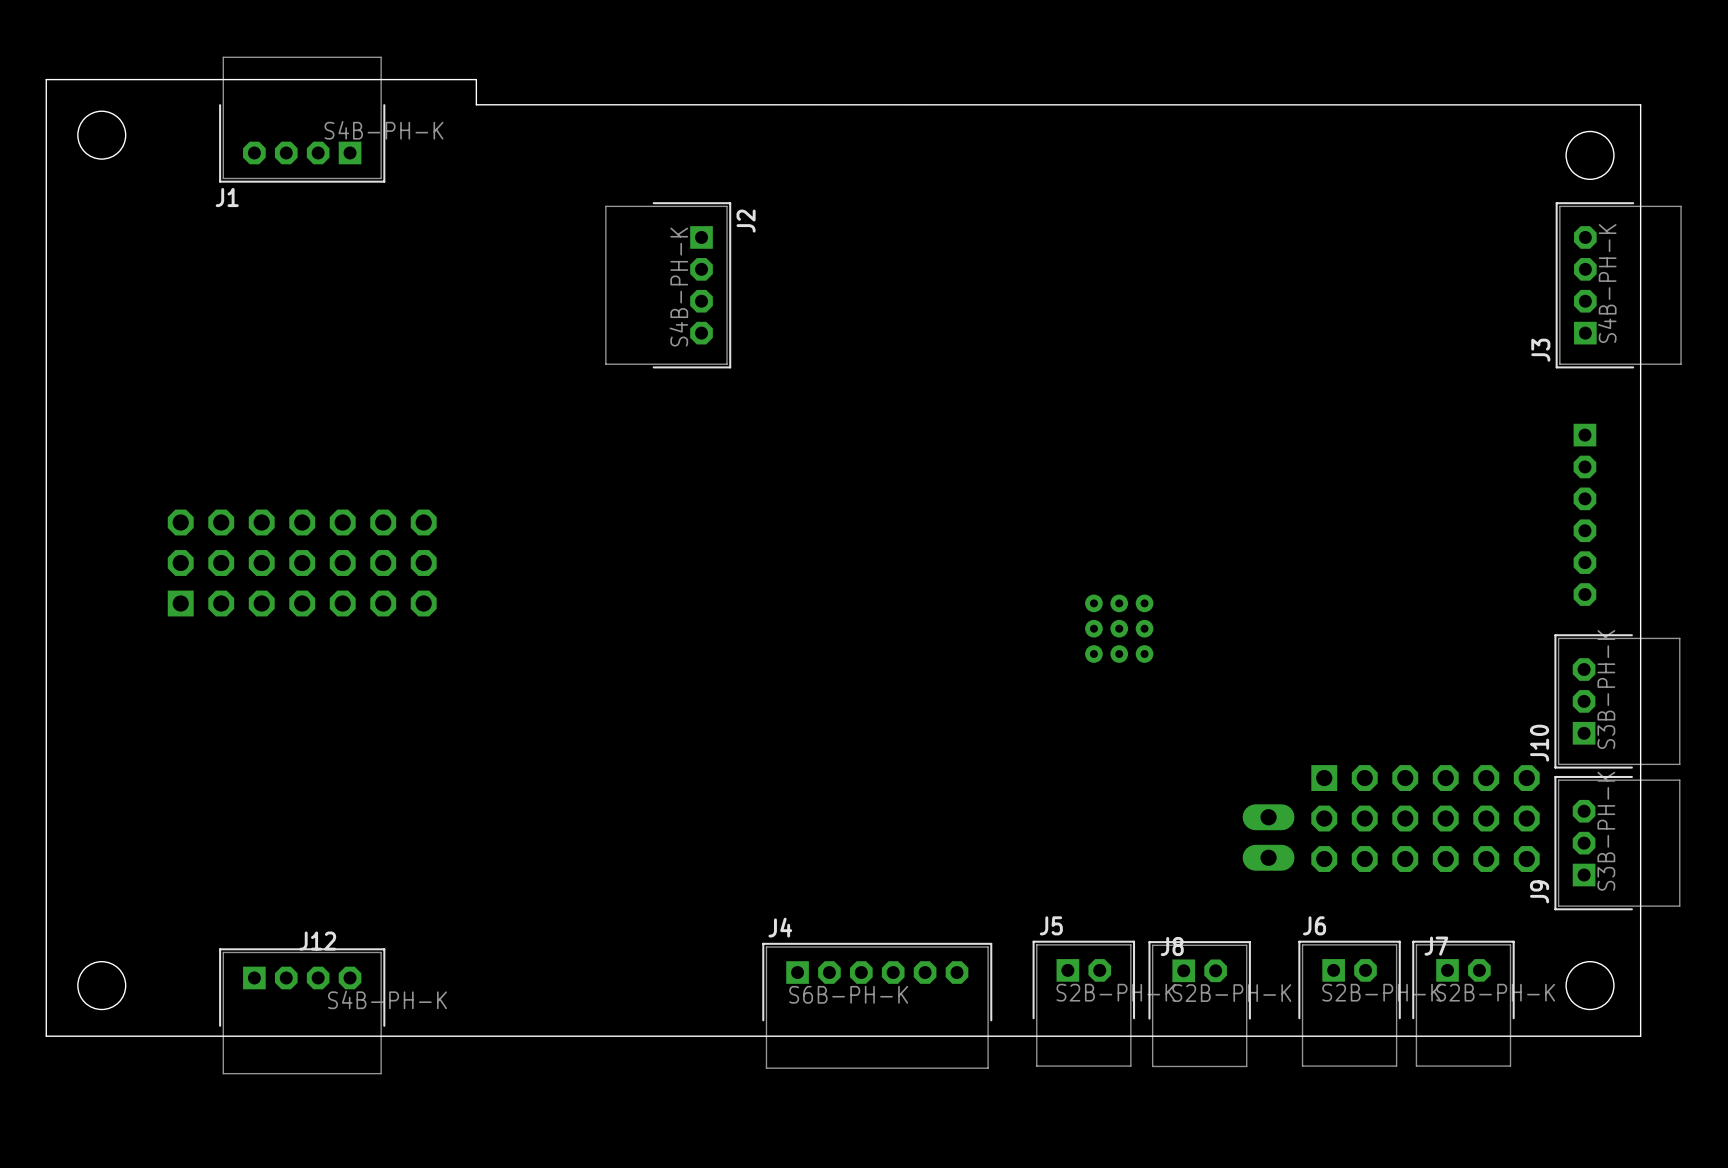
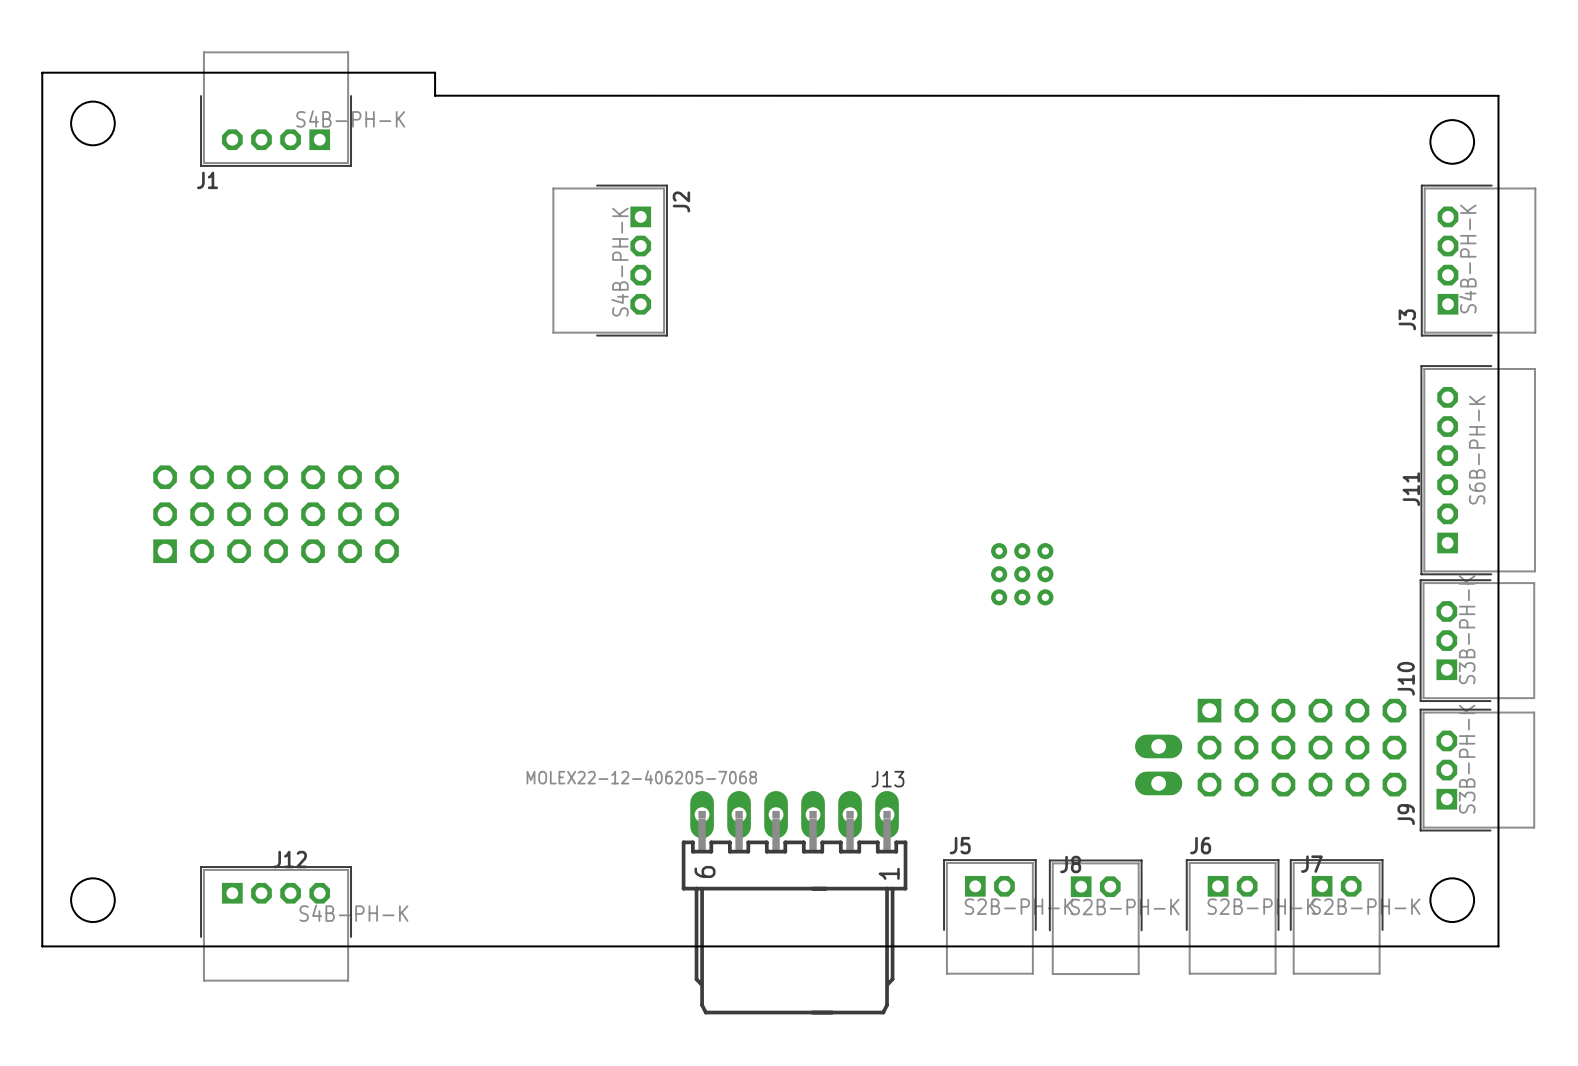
J11 side: top (1584, 514) -> bottom (1477, 470)
J13: none -> MOLEX22-12-406205-7068 (794, 902)
J4: S6B-PH-K (877, 1005) -> none

